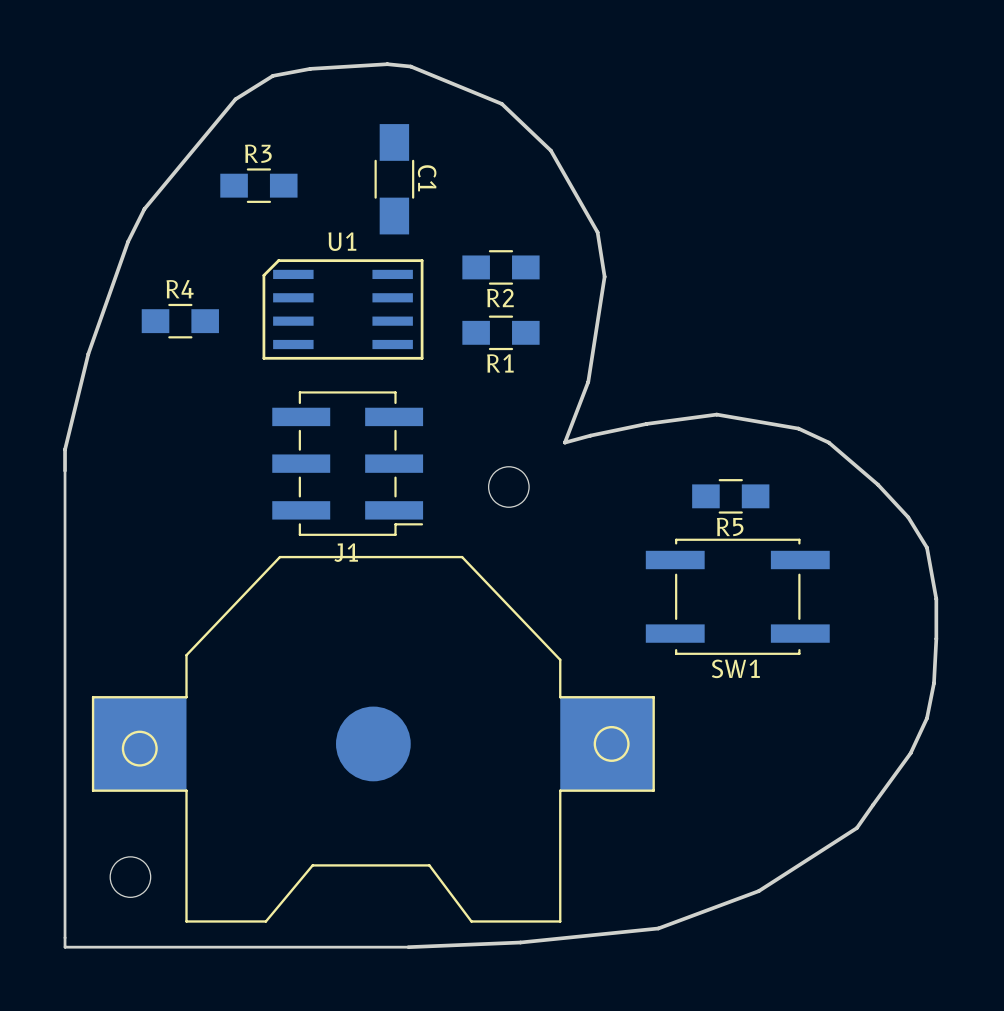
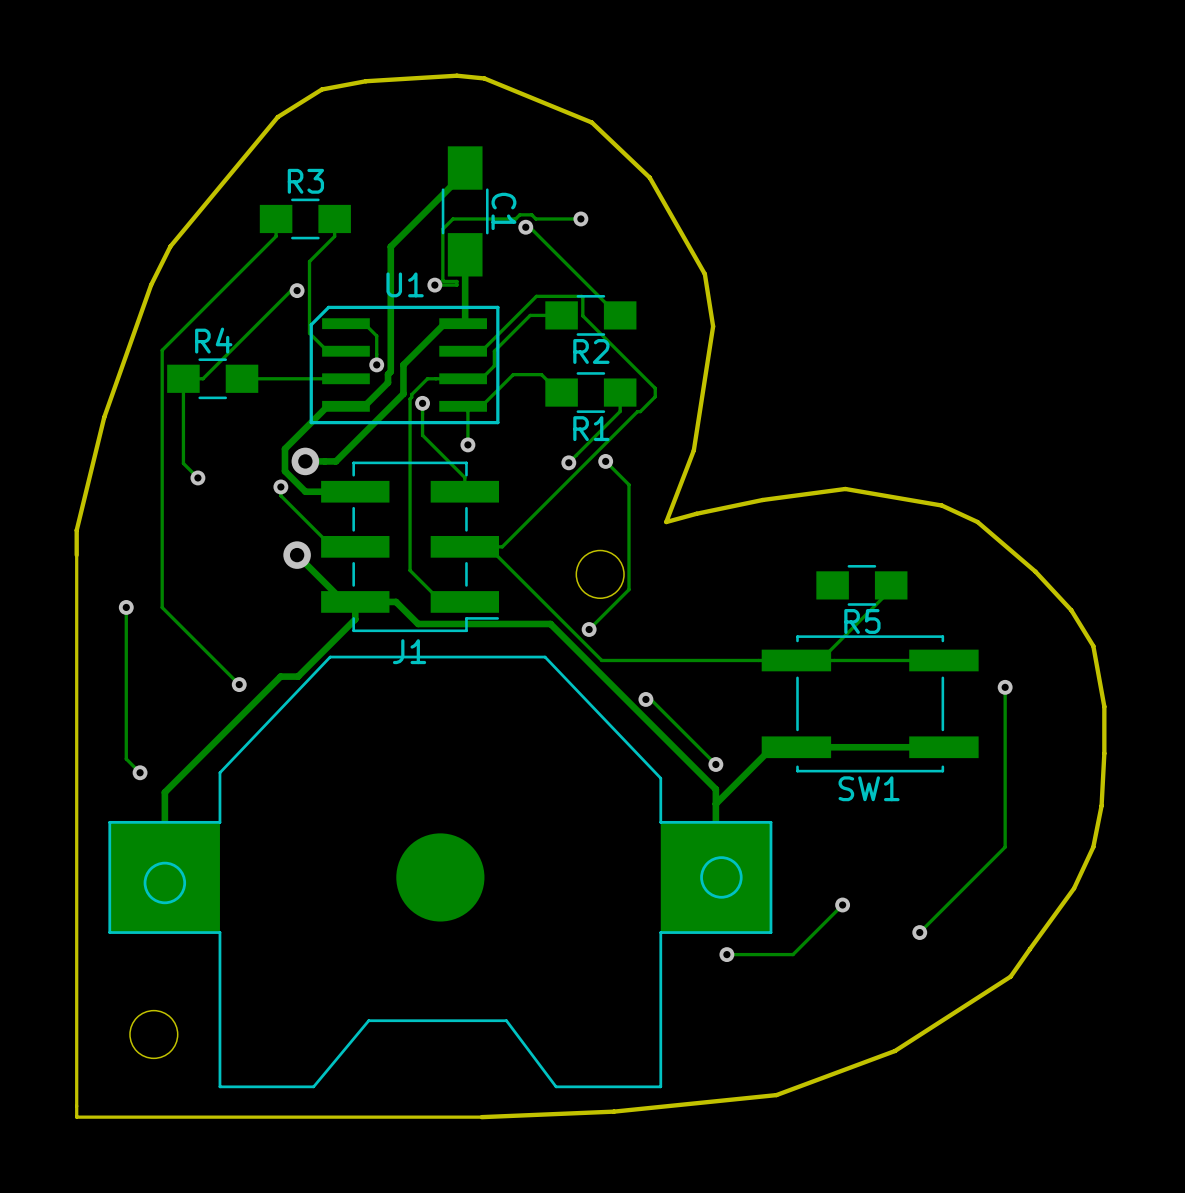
track: none -> (465, 168) (465, 172) (390, 246) (390, 371) (388, 374) (388, 382) (364, 406) (327, 406) (284, 448) (284, 471) (305, 491) (355, 491)
track: none -> (276, 218) (276, 236) (162, 350) (162, 607) (239, 684)
track: none -> (334, 218) (334, 236) (309, 261) (309, 333) (327, 351) (345, 351)
track: none -> (580, 218) (535, 218) (531, 214) (519, 214) (515, 218) (453, 218) (442, 229) (442, 280) (456, 281) (456, 285) (434, 285)
via: none -> (580, 218)
track: none -> (525, 227) (529, 227) (617, 315) (620, 315)
via: none -> (525, 227)
track: none -> (465, 254) (465, 321) (463, 323) (444, 323) (403, 364) (403, 393) (335, 461) (305, 461)
via: none -> (434, 285)
track: none -> (297, 290) (291, 290) (203, 378) (183, 378) (183, 463) (197, 477)
via: none -> (297, 290)
track: none -> (561, 315) (530, 315) (494, 351) (494, 365) (481, 378) (427, 378) (411, 394) (410, 398) (410, 570) (441, 601) (464, 601)
track: none -> (345, 323) (364, 323) (376, 335) (376, 364)
track: none -> (463, 351) (481, 351) (536, 296) (581, 296) (582, 315) (655, 388) (655, 396) (640, 411) (637, 411) (502, 546) (464, 546)
via: none -> (376, 364)
track: none -> (345, 378) (242, 378)
track: none -> (561, 392) (541, 374) (513, 374) (481, 406) (463, 406) (467, 411) (467, 444)
track: none -> (620, 392) (620, 411) (568, 462)
track: none -> (422, 403) (422, 435) (464, 477) (464, 491)
via: none -> (422, 403)
via: none -> (467, 444)
via: none -> (305, 461)
track: none -> (605, 461) (628, 484) (628, 589) (589, 629)
via: none -> (605, 461)
via: none -> (568, 462)
via: none -> (197, 477)
track: none -> (280, 486) (280, 495) (331, 546) (355, 546)
via: none -> (280, 486)
track: none -> (488, 546) (601, 660) (943, 660)
track: none -> (297, 555) (343, 601) (396, 601) (418, 623) (550, 623) (715, 789) (715, 877)
via: none -> (297, 555)
track: none -> (891, 585) (891, 589) (820, 660)
track: none -> (355, 601) (355, 619) (298, 676) (280, 676) (164, 792) (164, 877)
track: none -> (126, 607) (126, 758) (140, 772)
via: none -> (126, 607)
via: none -> (589, 629)
via: none -> (239, 684)
track: none -> (1005, 687) (1005, 847) (919, 932)
via: none -> (1005, 687)
track: none -> (645, 699) (650, 699) (715, 764)
via: none -> (645, 699)
track: none -> (943, 747) (772, 747) (715, 803)
via: none -> (715, 764)
via: none -> (140, 772)
track: none -> (842, 905) (793, 954) (726, 954)
via: none -> (842, 905)
via: none -> (919, 932)
via: none -> (726, 954)

